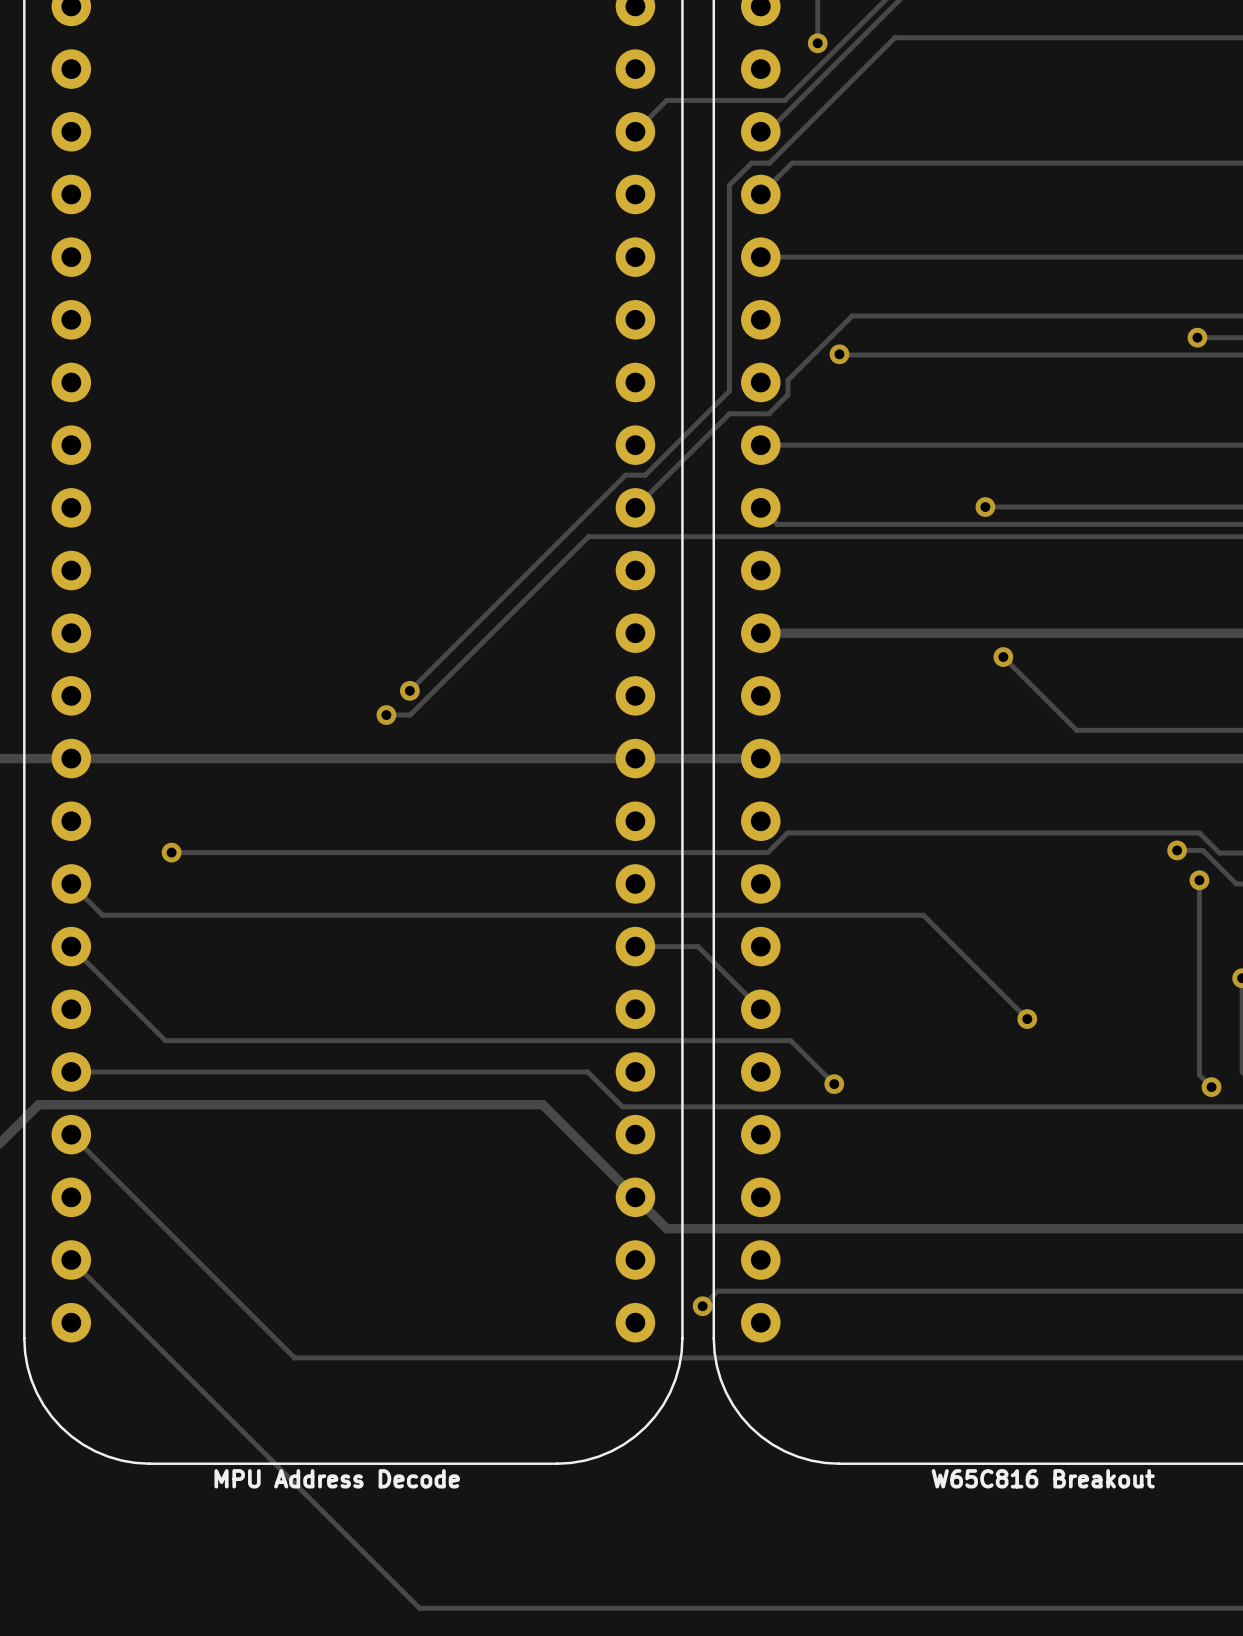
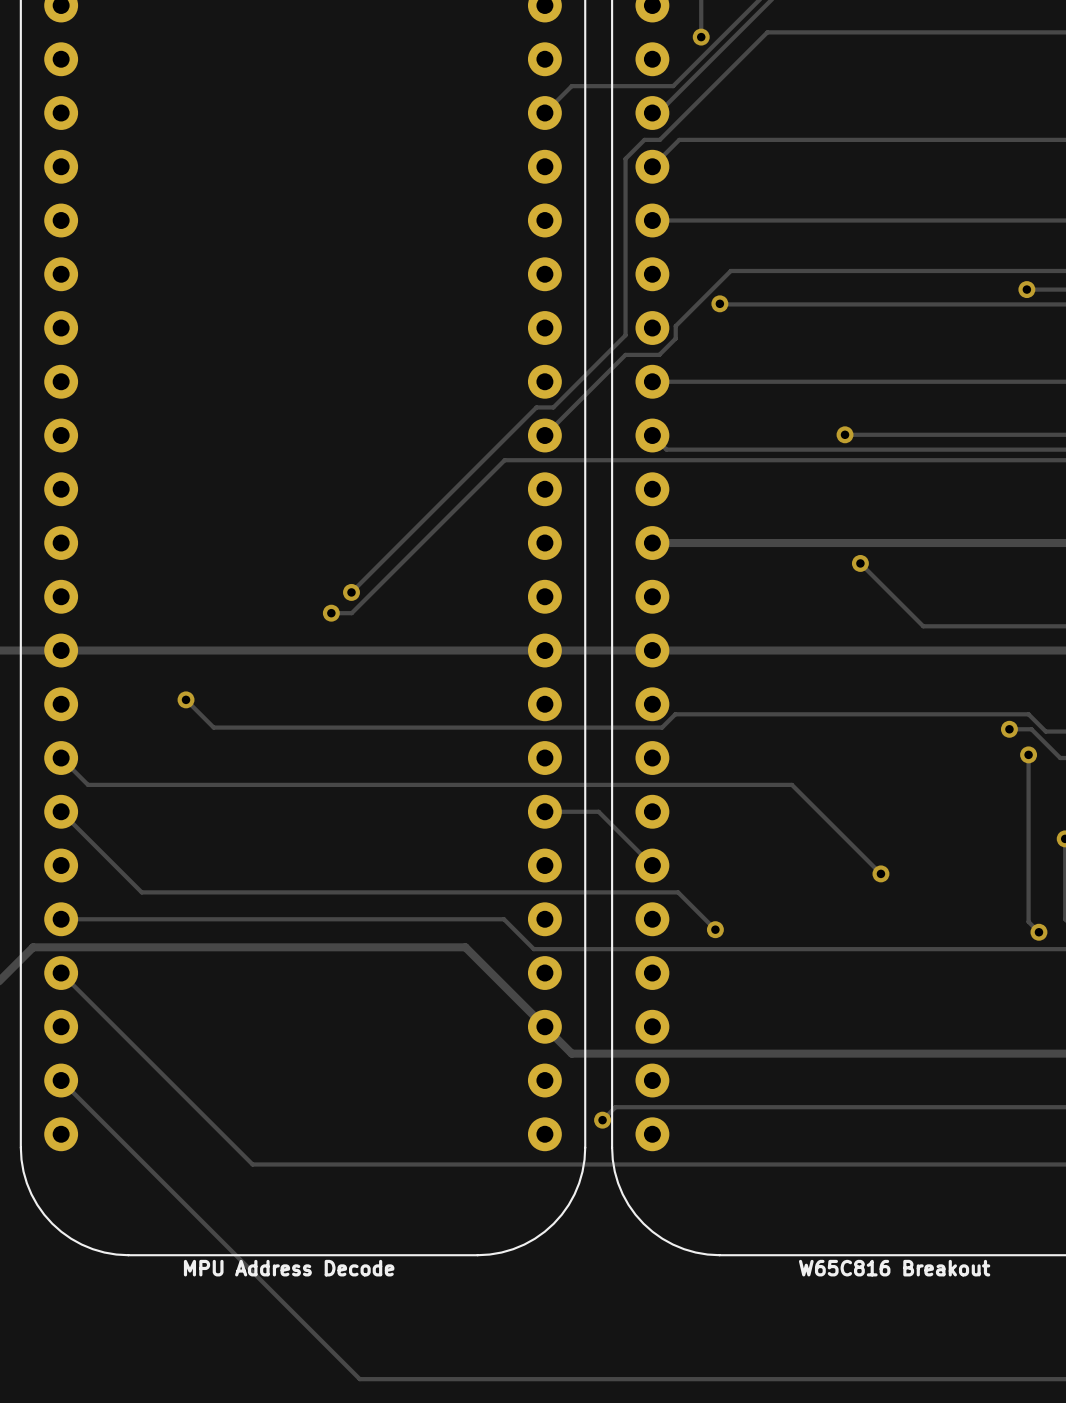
track: (772, 848) (767, 852) (171, 852) -> (662, 727) (213, 727) (186, 699)
via position: (171, 852) -> (186, 699)

